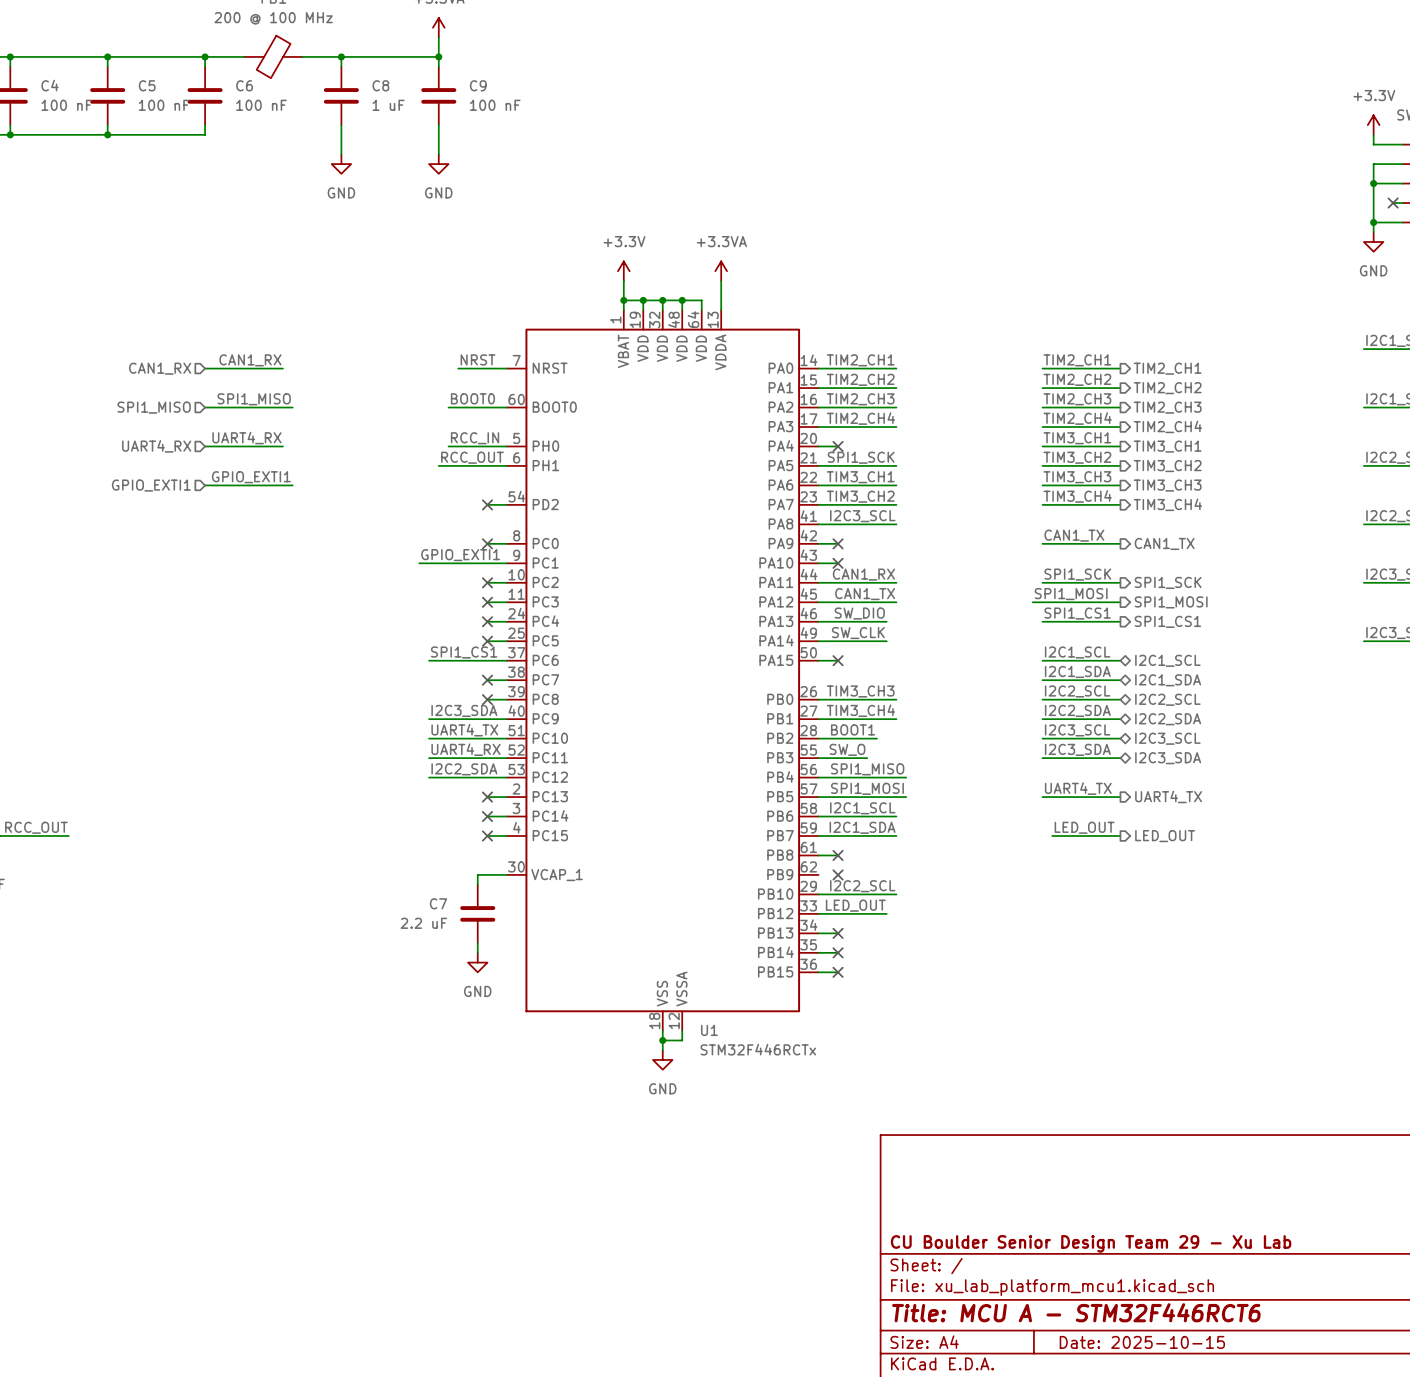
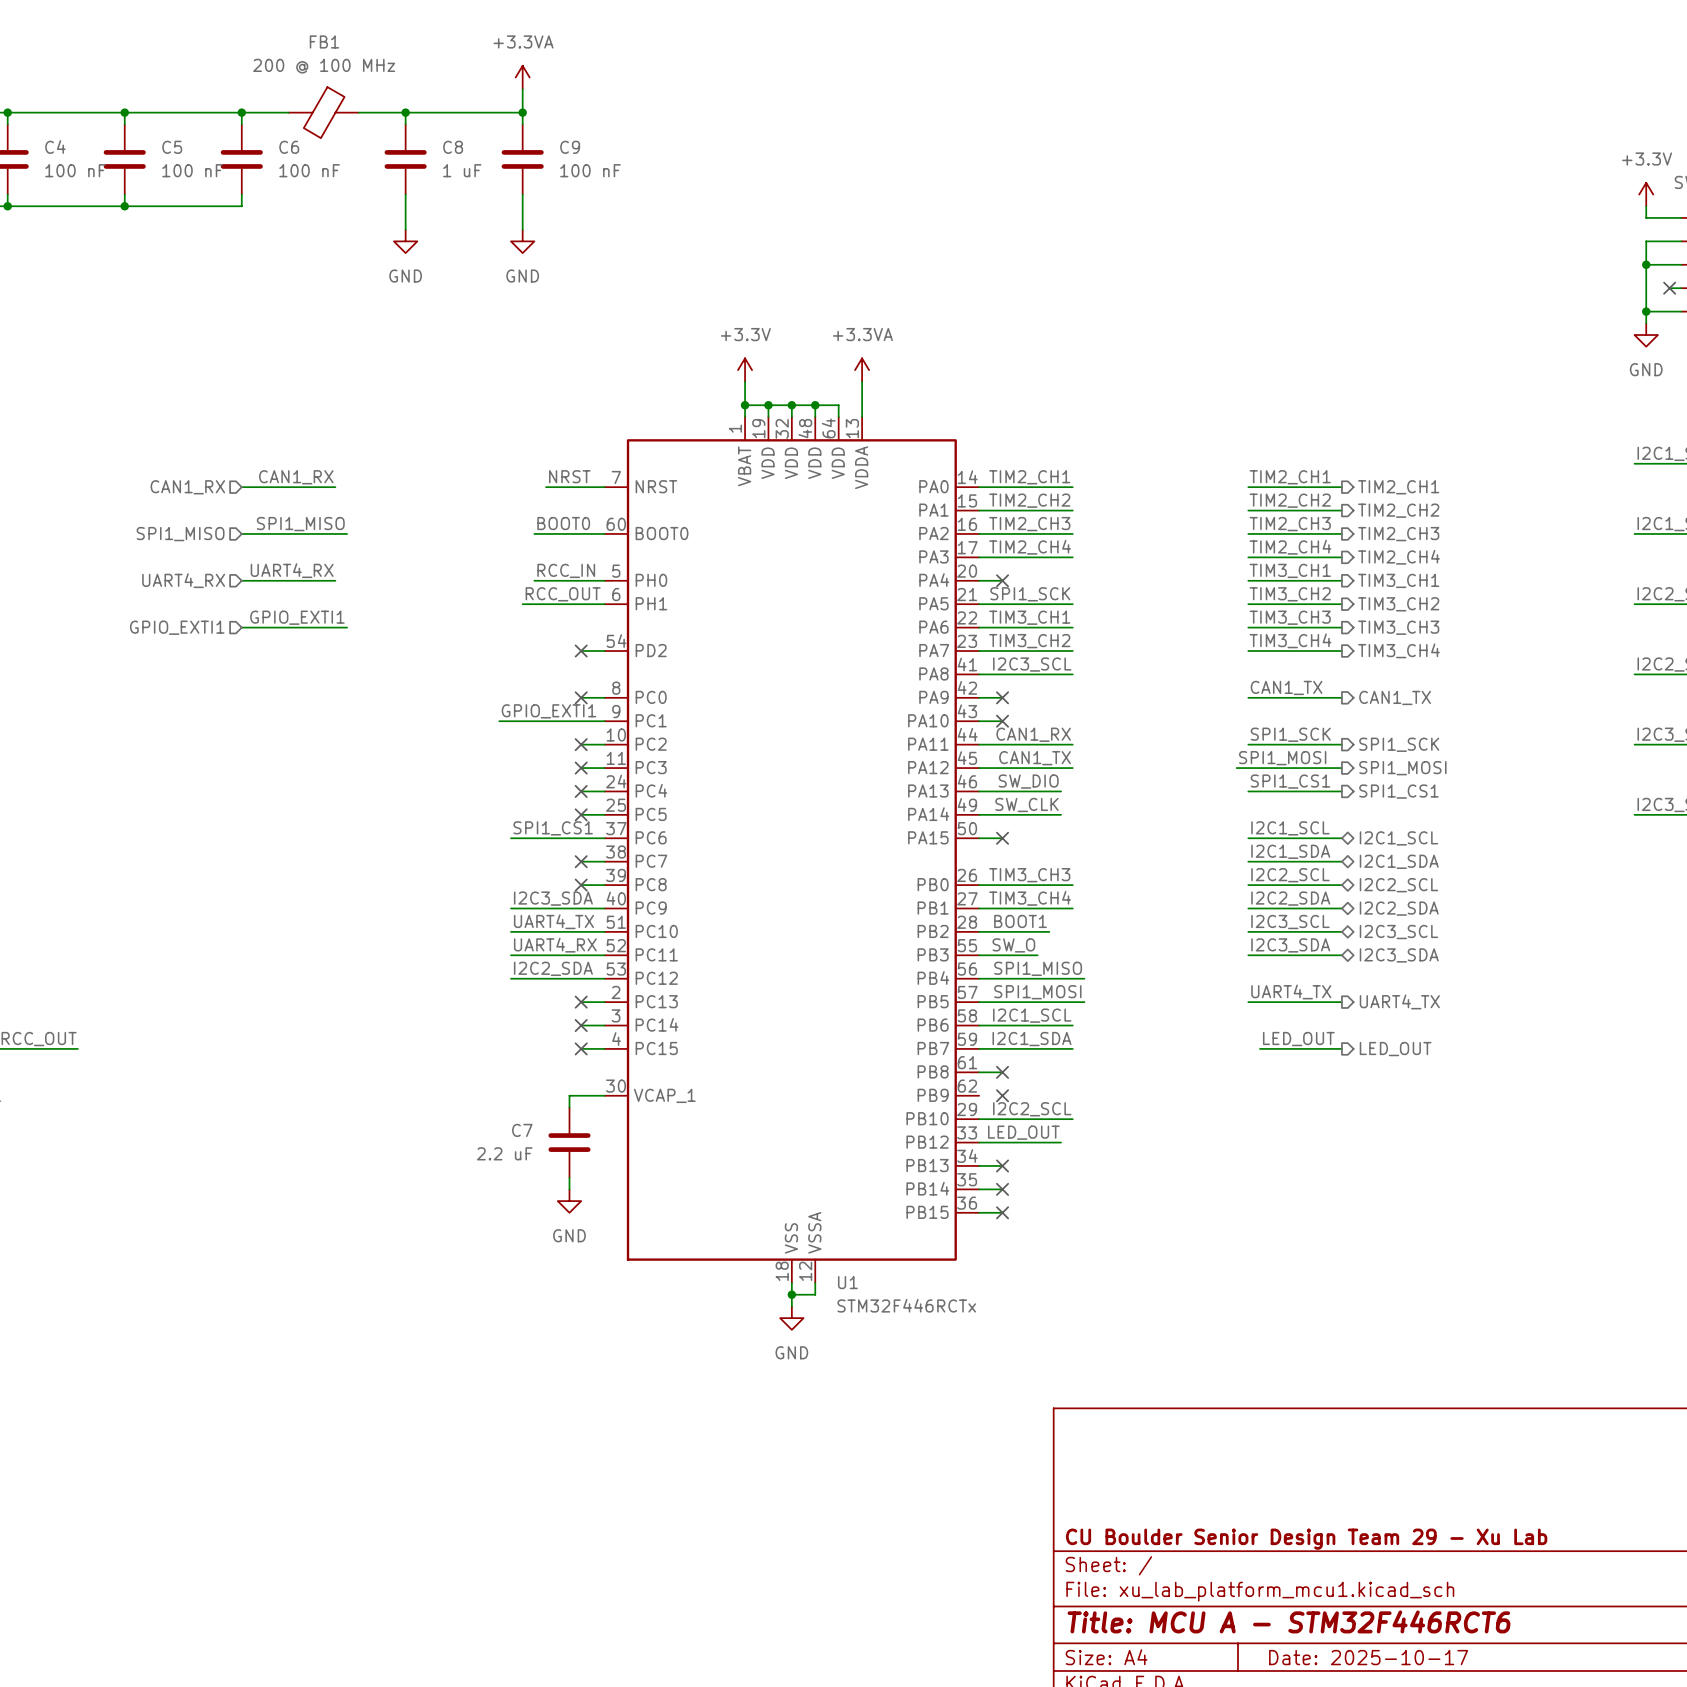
title block: Date: 2025-10-15 (1142, 1342) -> Date: 2025-10-17 (1368, 1657)

